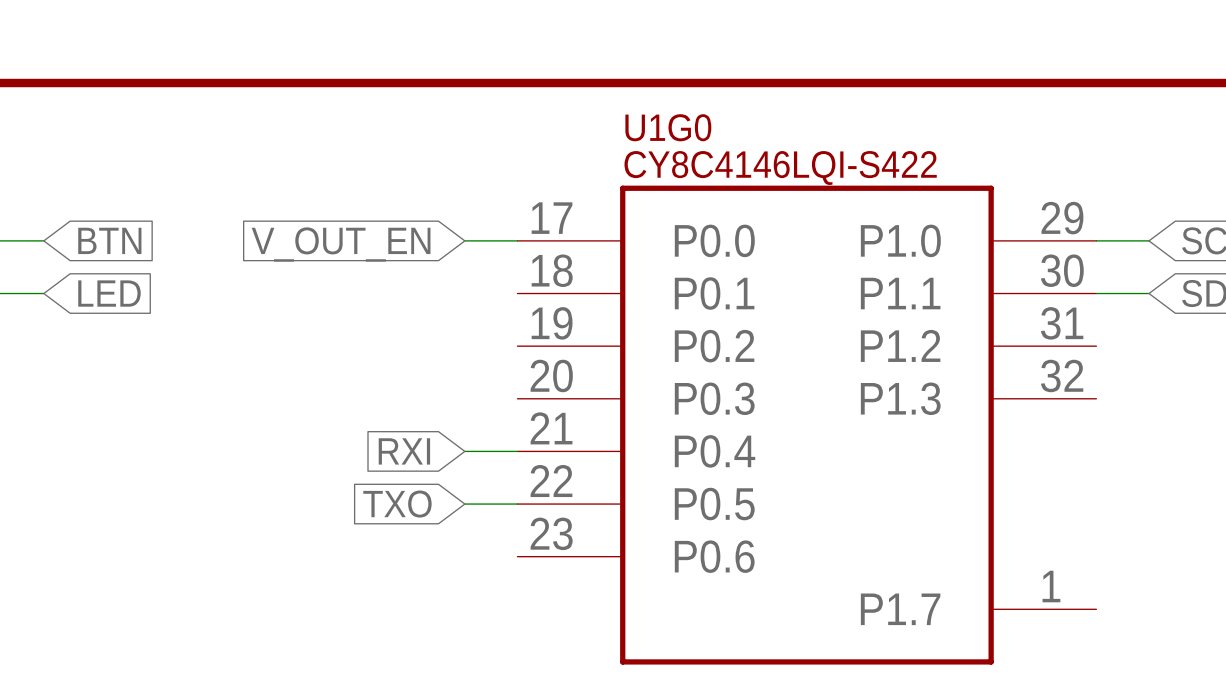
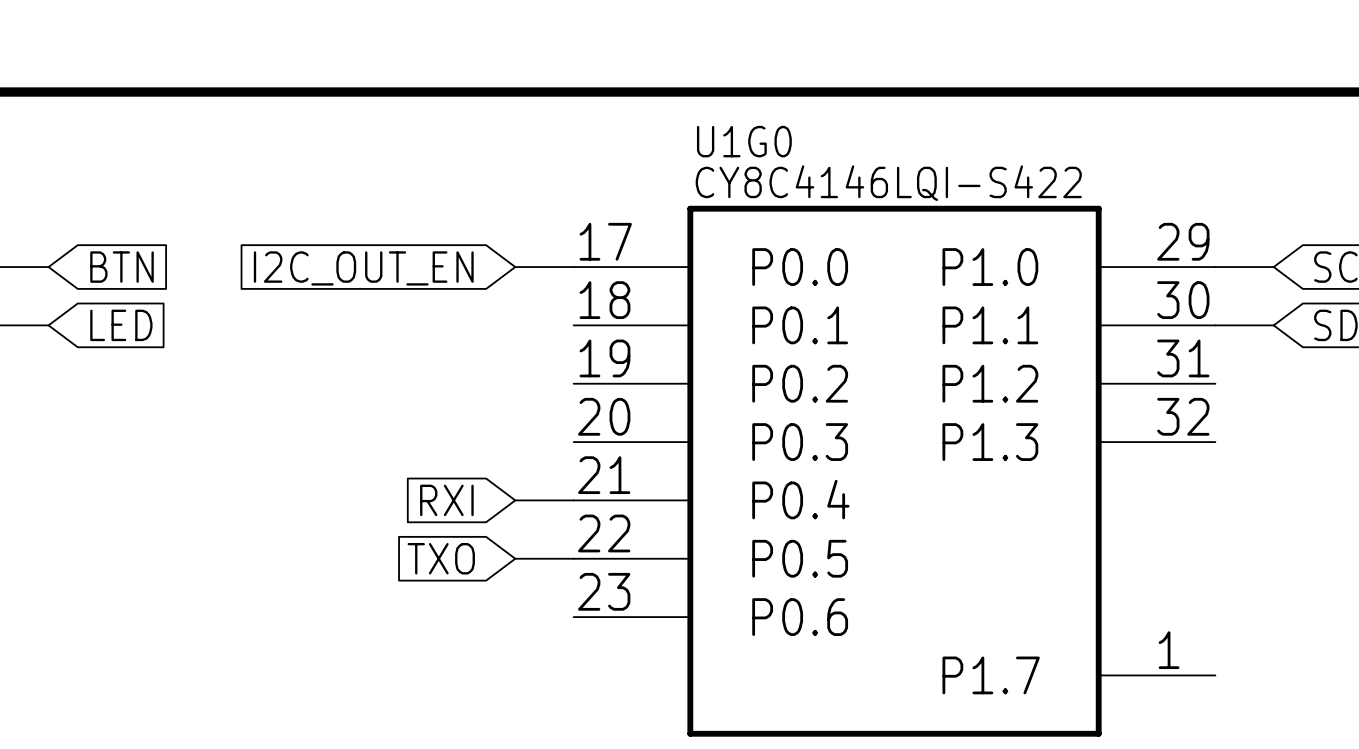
global label: V_OUT_EN (341, 244) -> I2C_OUT_EN (363, 268)

